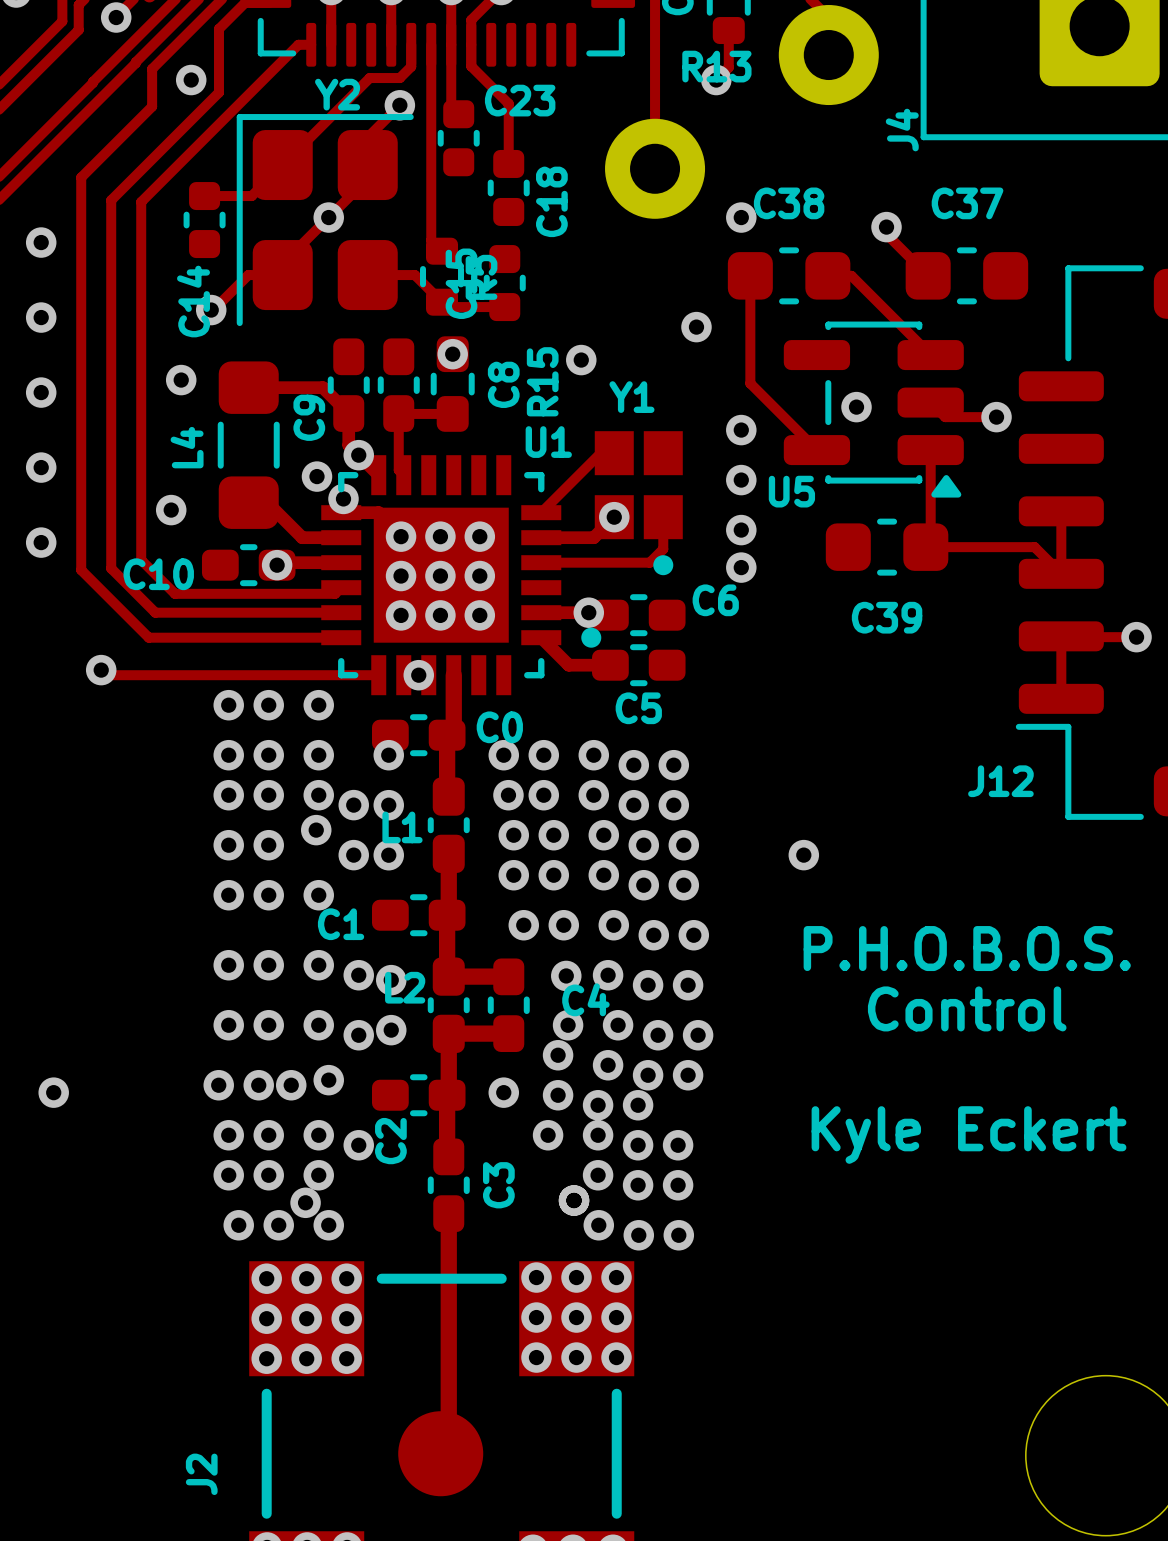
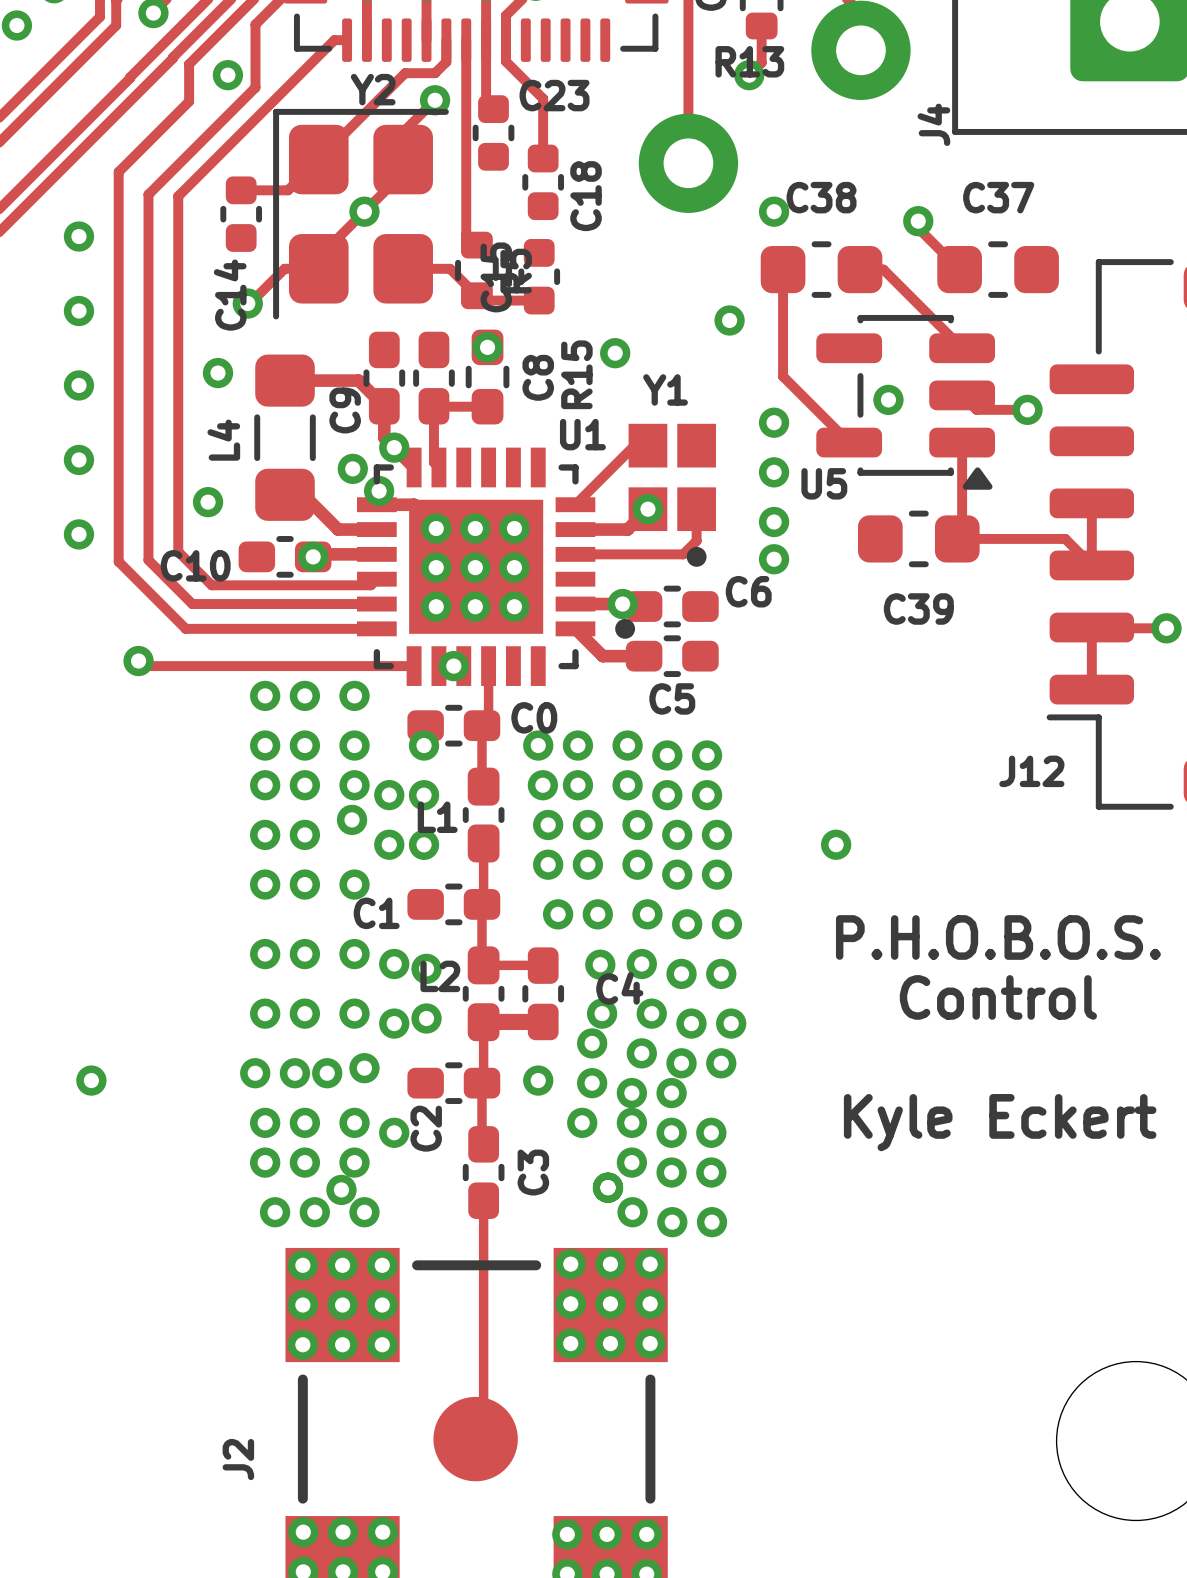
track width: thick (453, 675) (453, 728) (447, 735) (447, 794) (448, 796) -> thin (488, 666) (488, 719) (482, 725) (482, 785) (483, 786)
track width: thick (448, 853) (447, 974) (448, 976) (508, 976) -> thin (483, 843) (482, 963) (483, 965) (542, 965)
track width: thick (448, 1033) (447, 1155) (448, 1156) -> thin (483, 1022) (482, 1142) (483, 1144)
track width: thick (448, 1213) (448, 1445) -> thin (483, 1200) (483, 1431)

